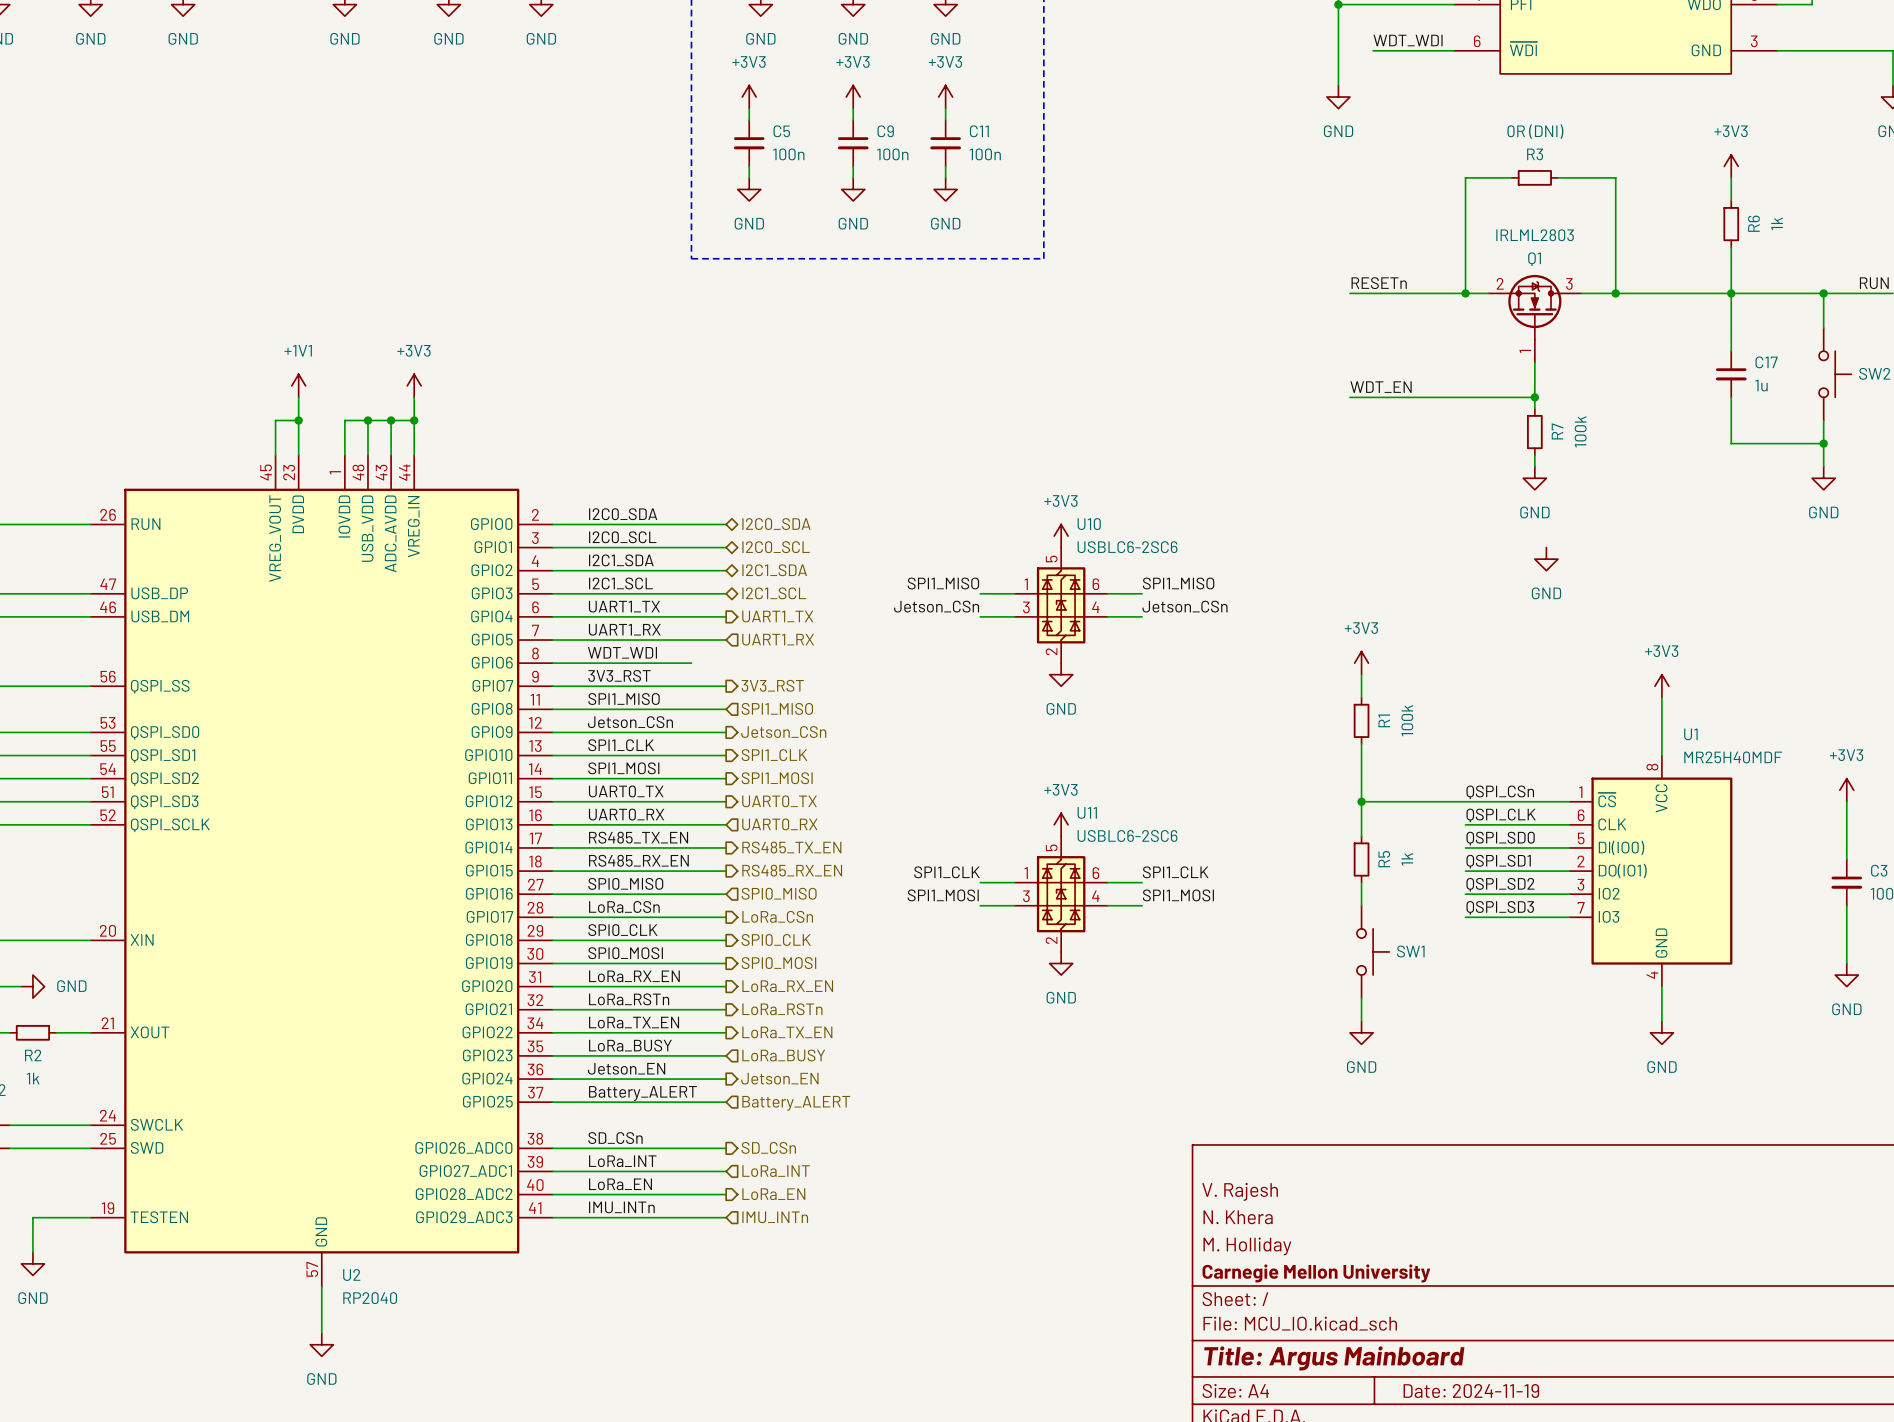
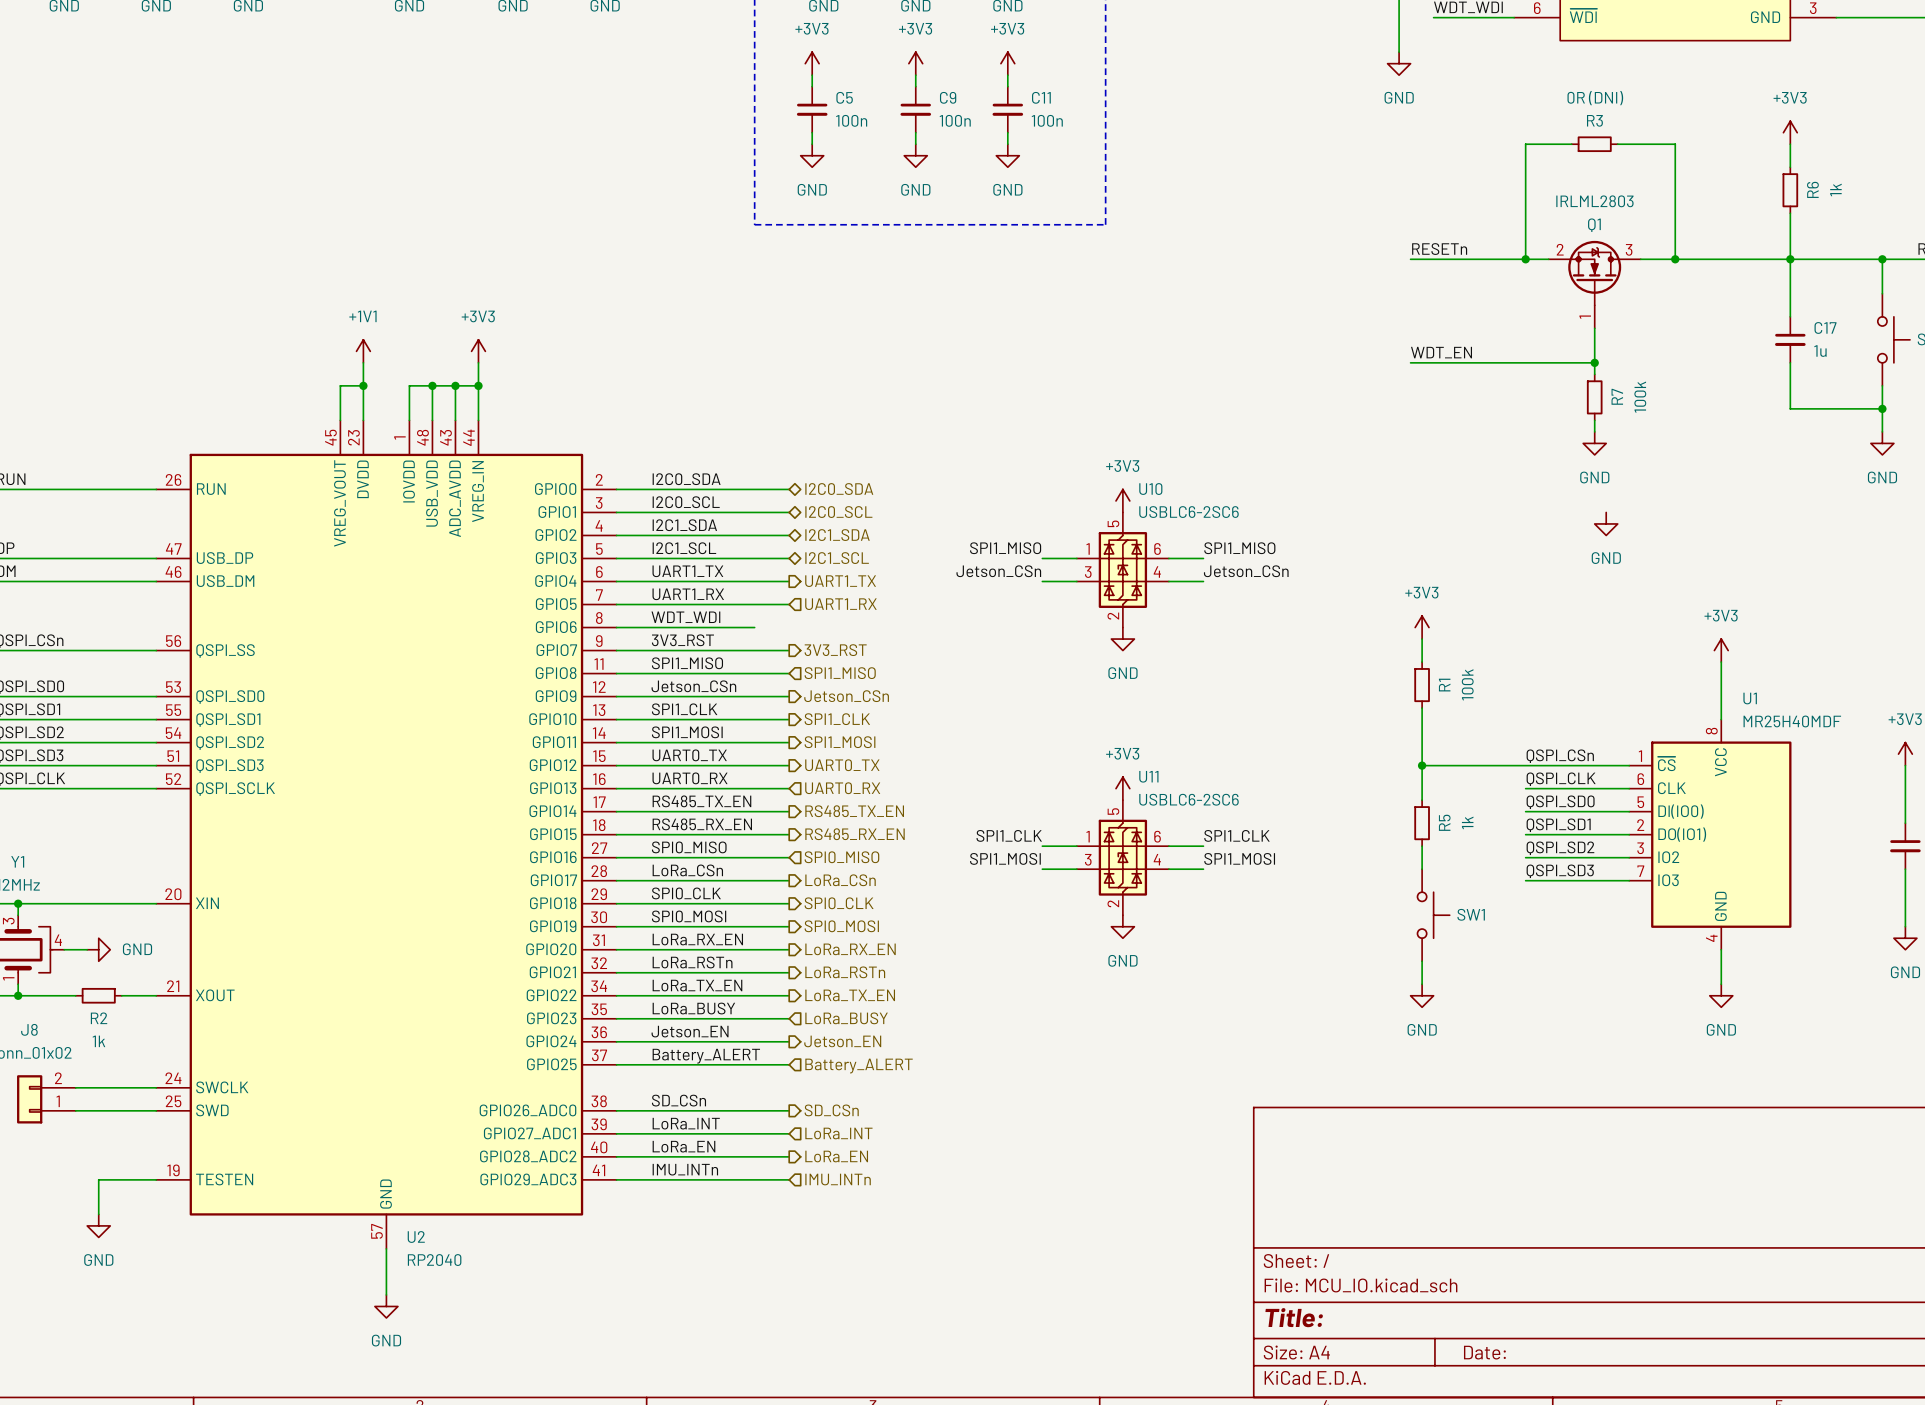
title block: V. Rajesh (1240, 1191) -> none
title block: N. Khera (1238, 1217) -> none
title block: M. Holliday (1247, 1246) -> none
title block: Carnegie Mellon University (1316, 1273) -> none
title block: Title: Argus Mainboard (1334, 1358) -> Title: (1294, 1317)
title block: Date: 2024-11-19 (1471, 1391) -> Date: (1484, 1352)

